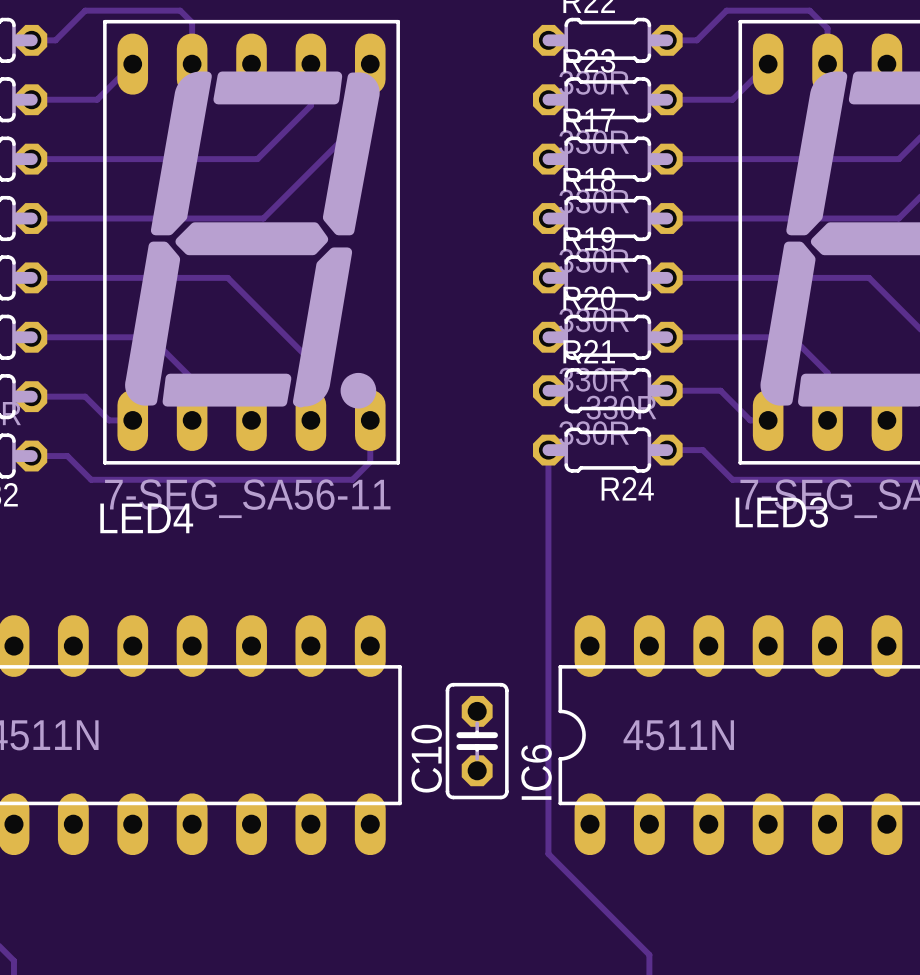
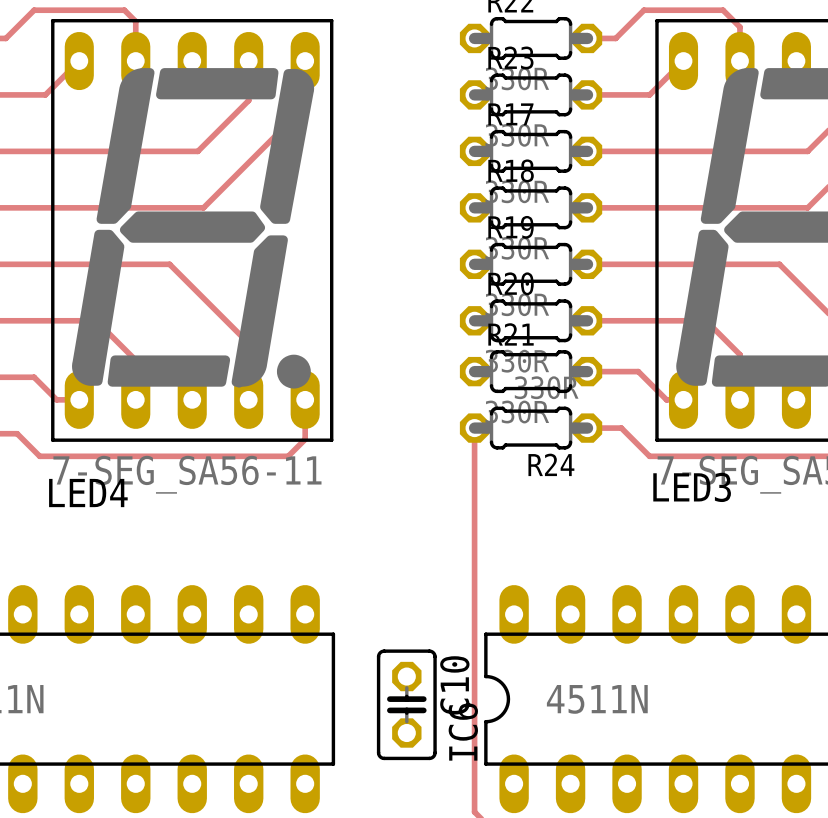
C10 name position: C10 (426, 758) -> C10 (454, 685)

